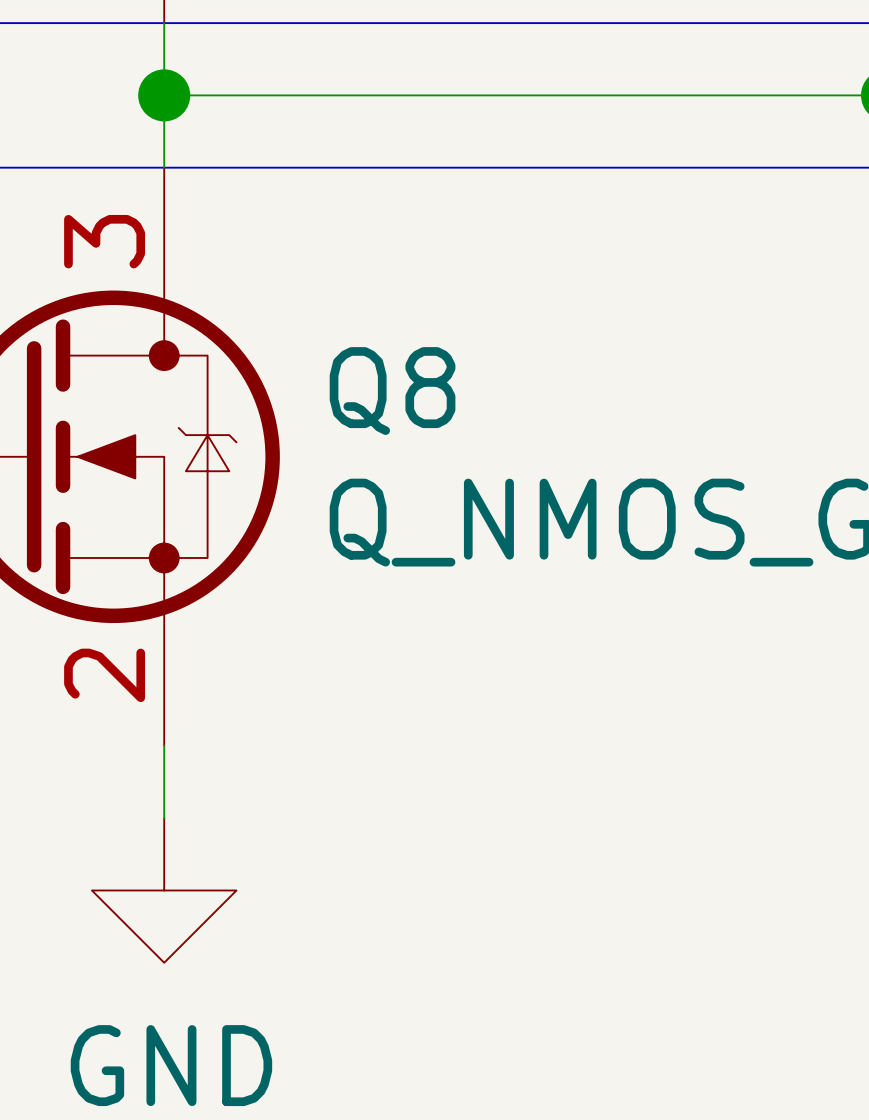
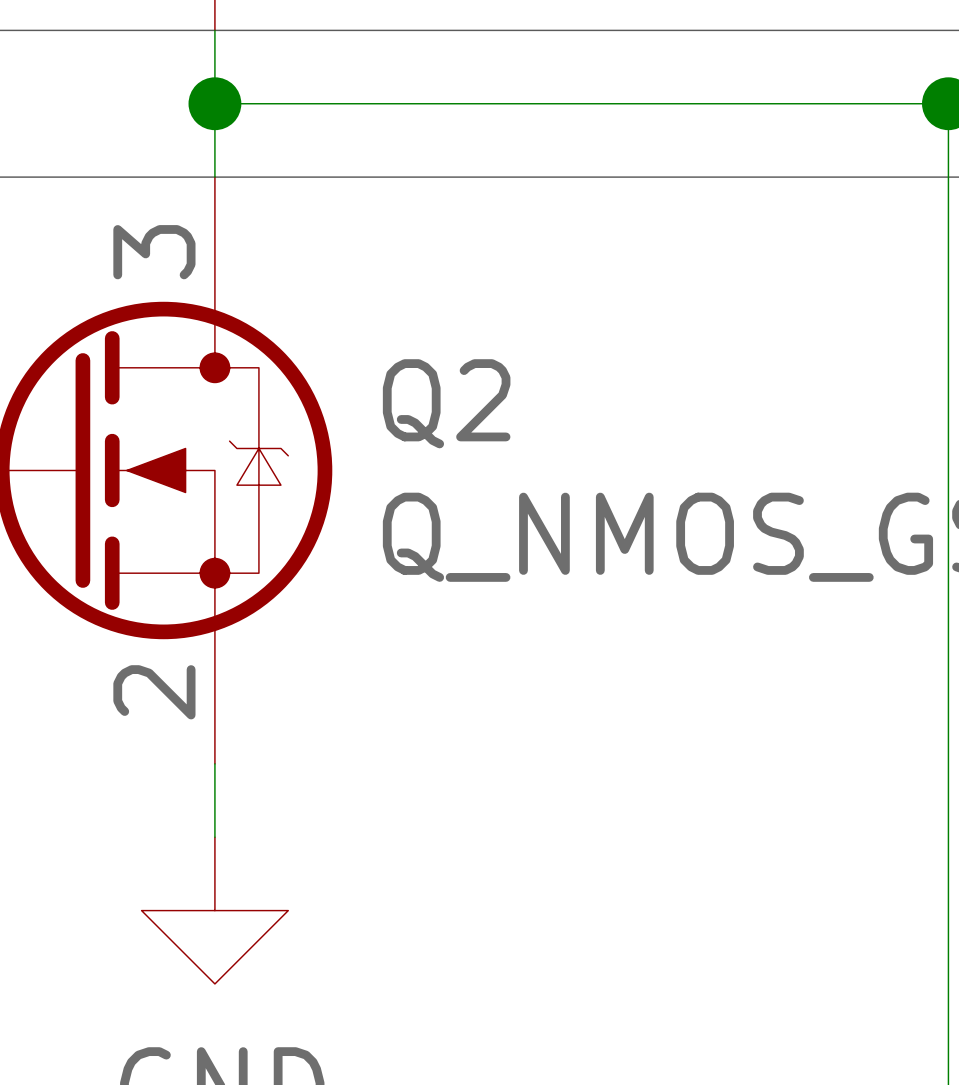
Q8 name: Q8 (392, 391) -> Q2 (446, 403)

